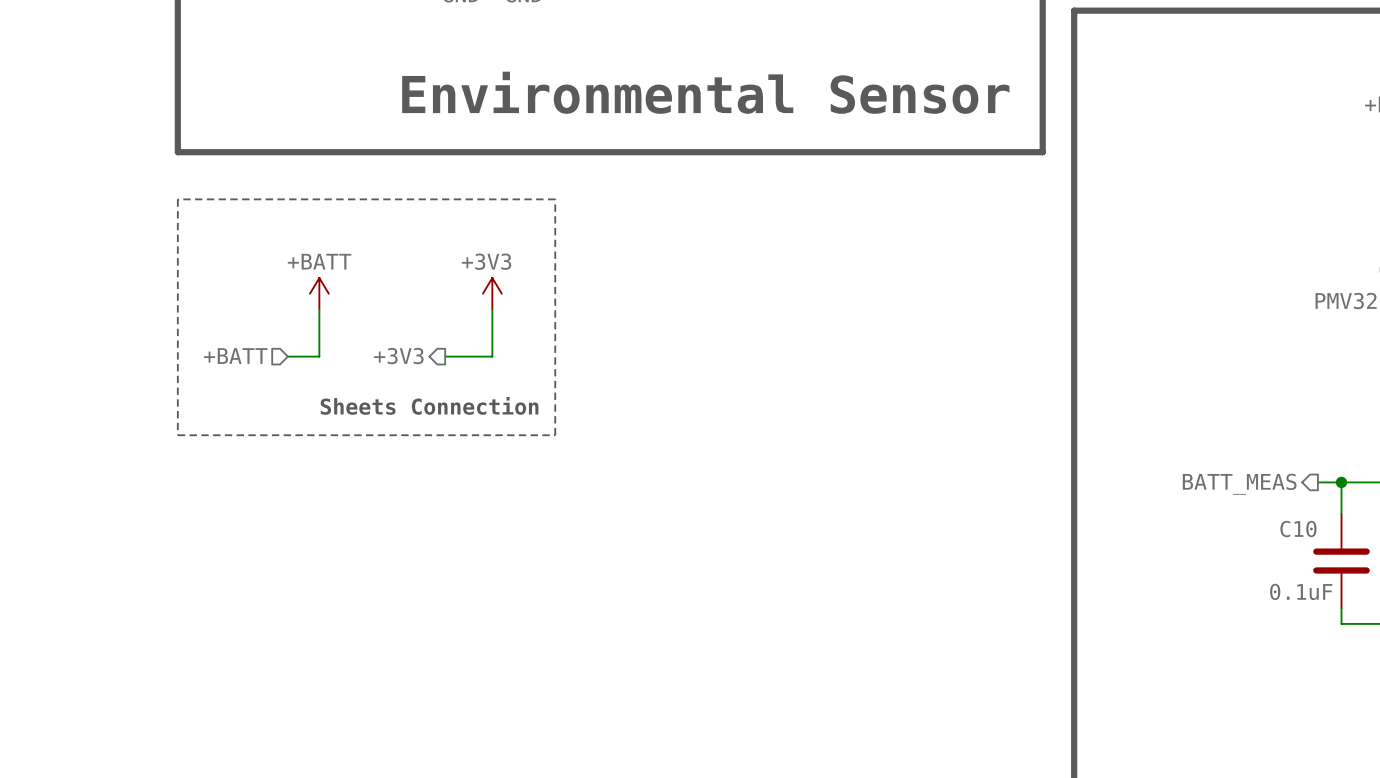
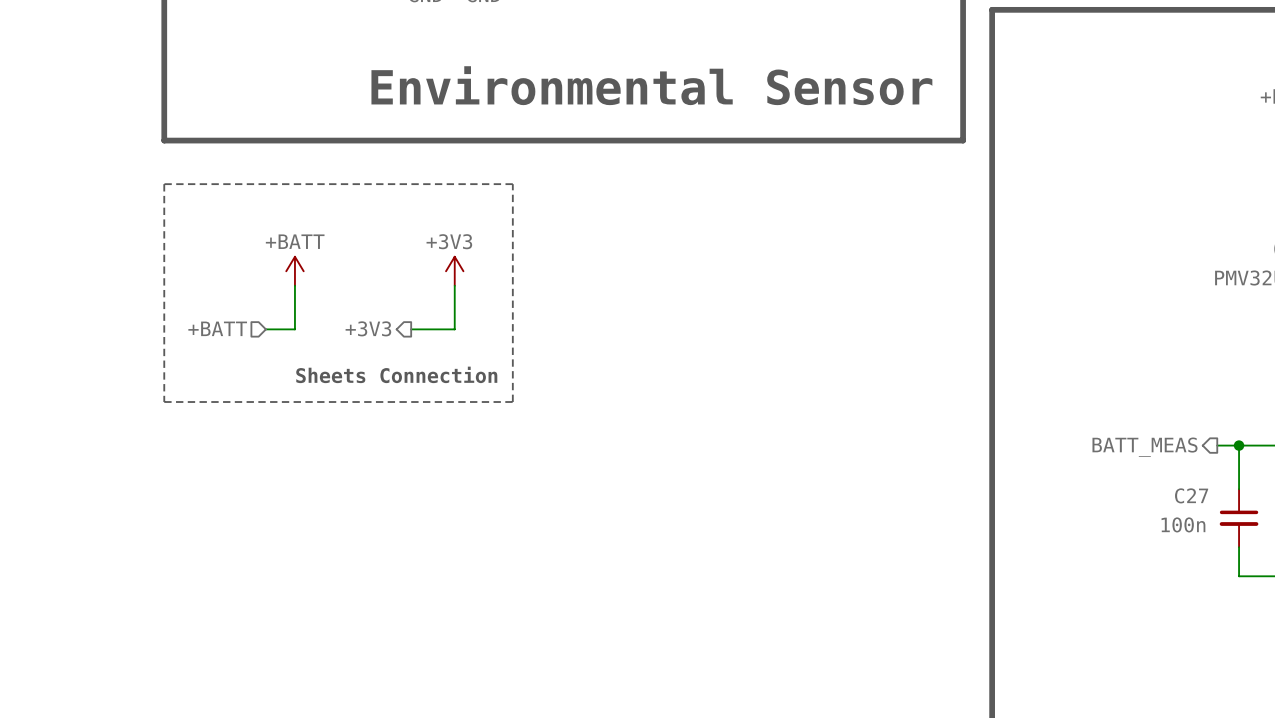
C10: 0.1uF (1341, 561) -> none
C27: none -> 100n (1239, 518)

